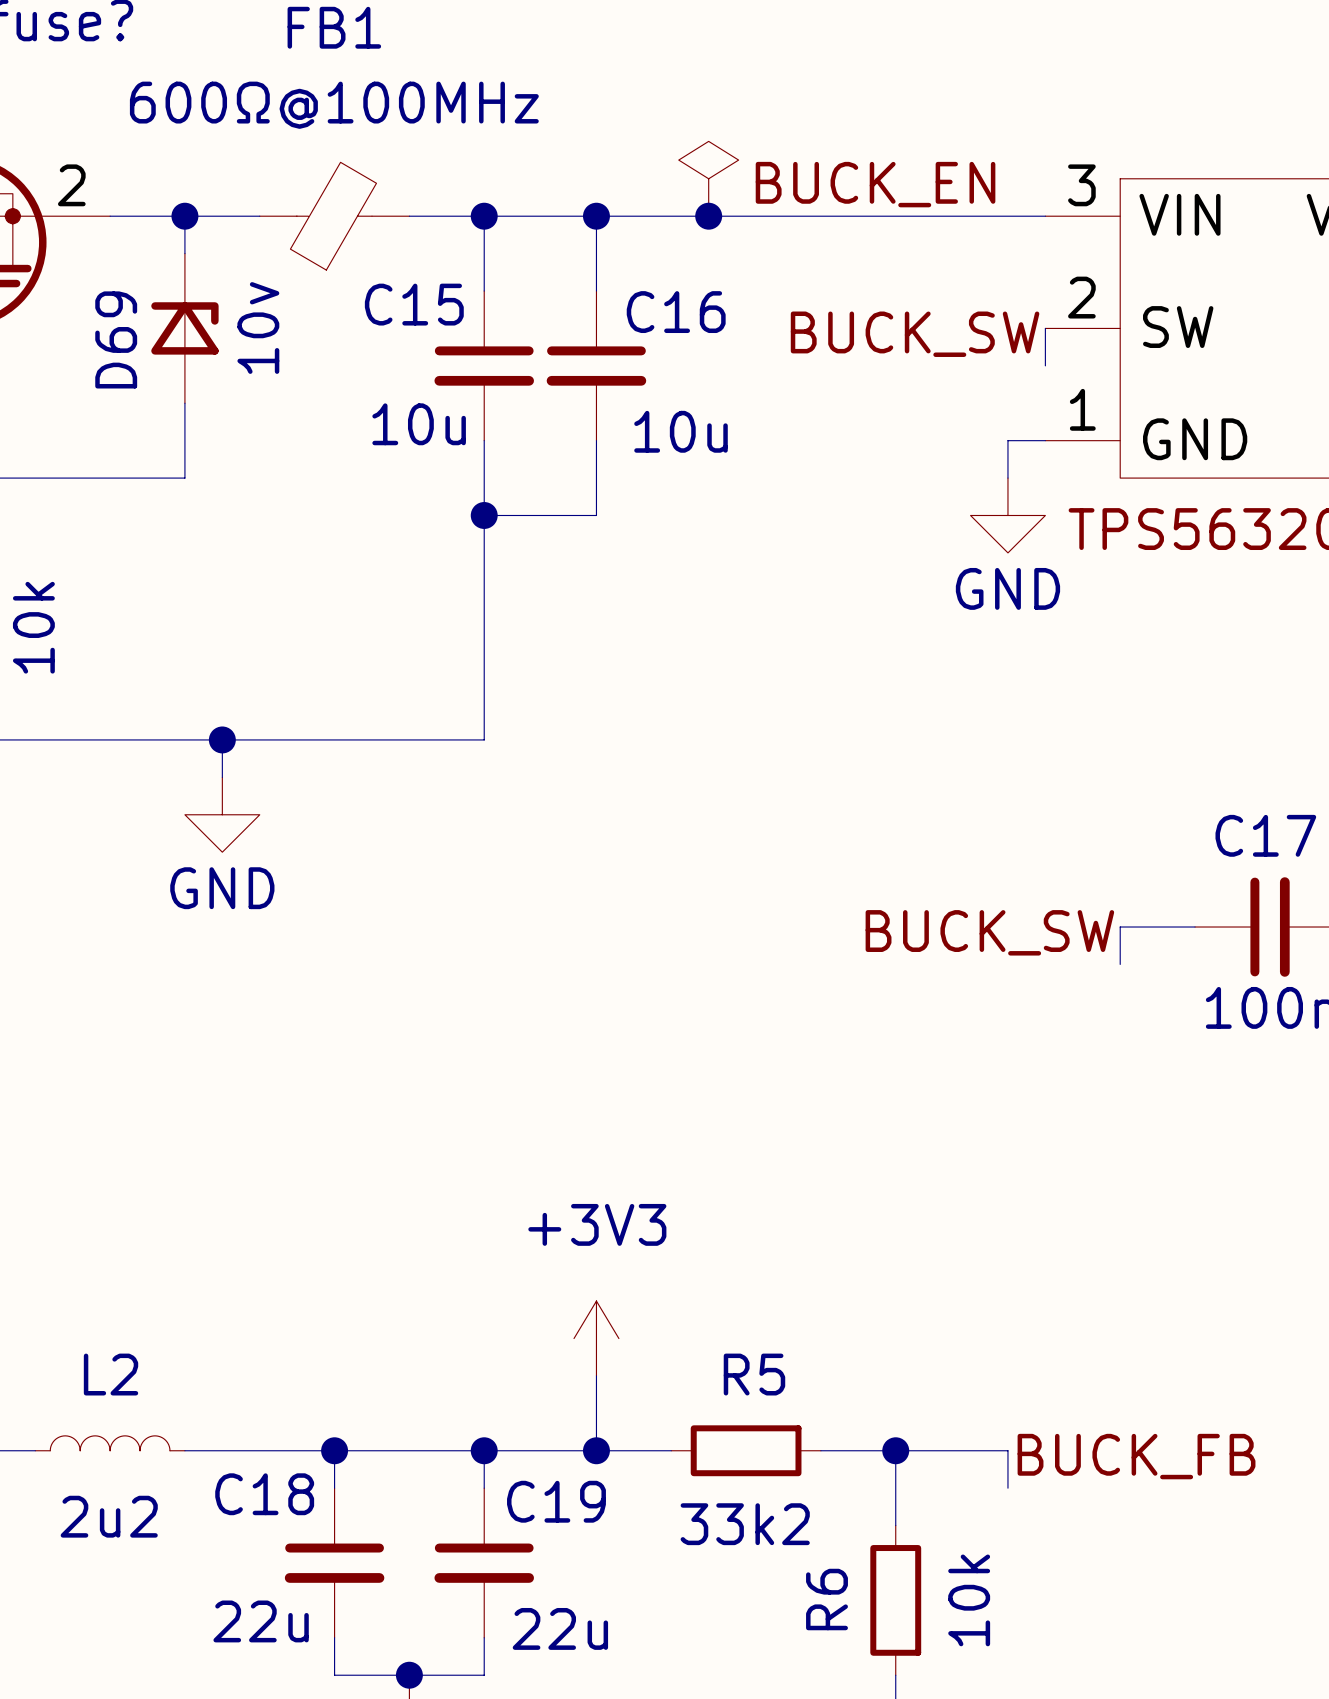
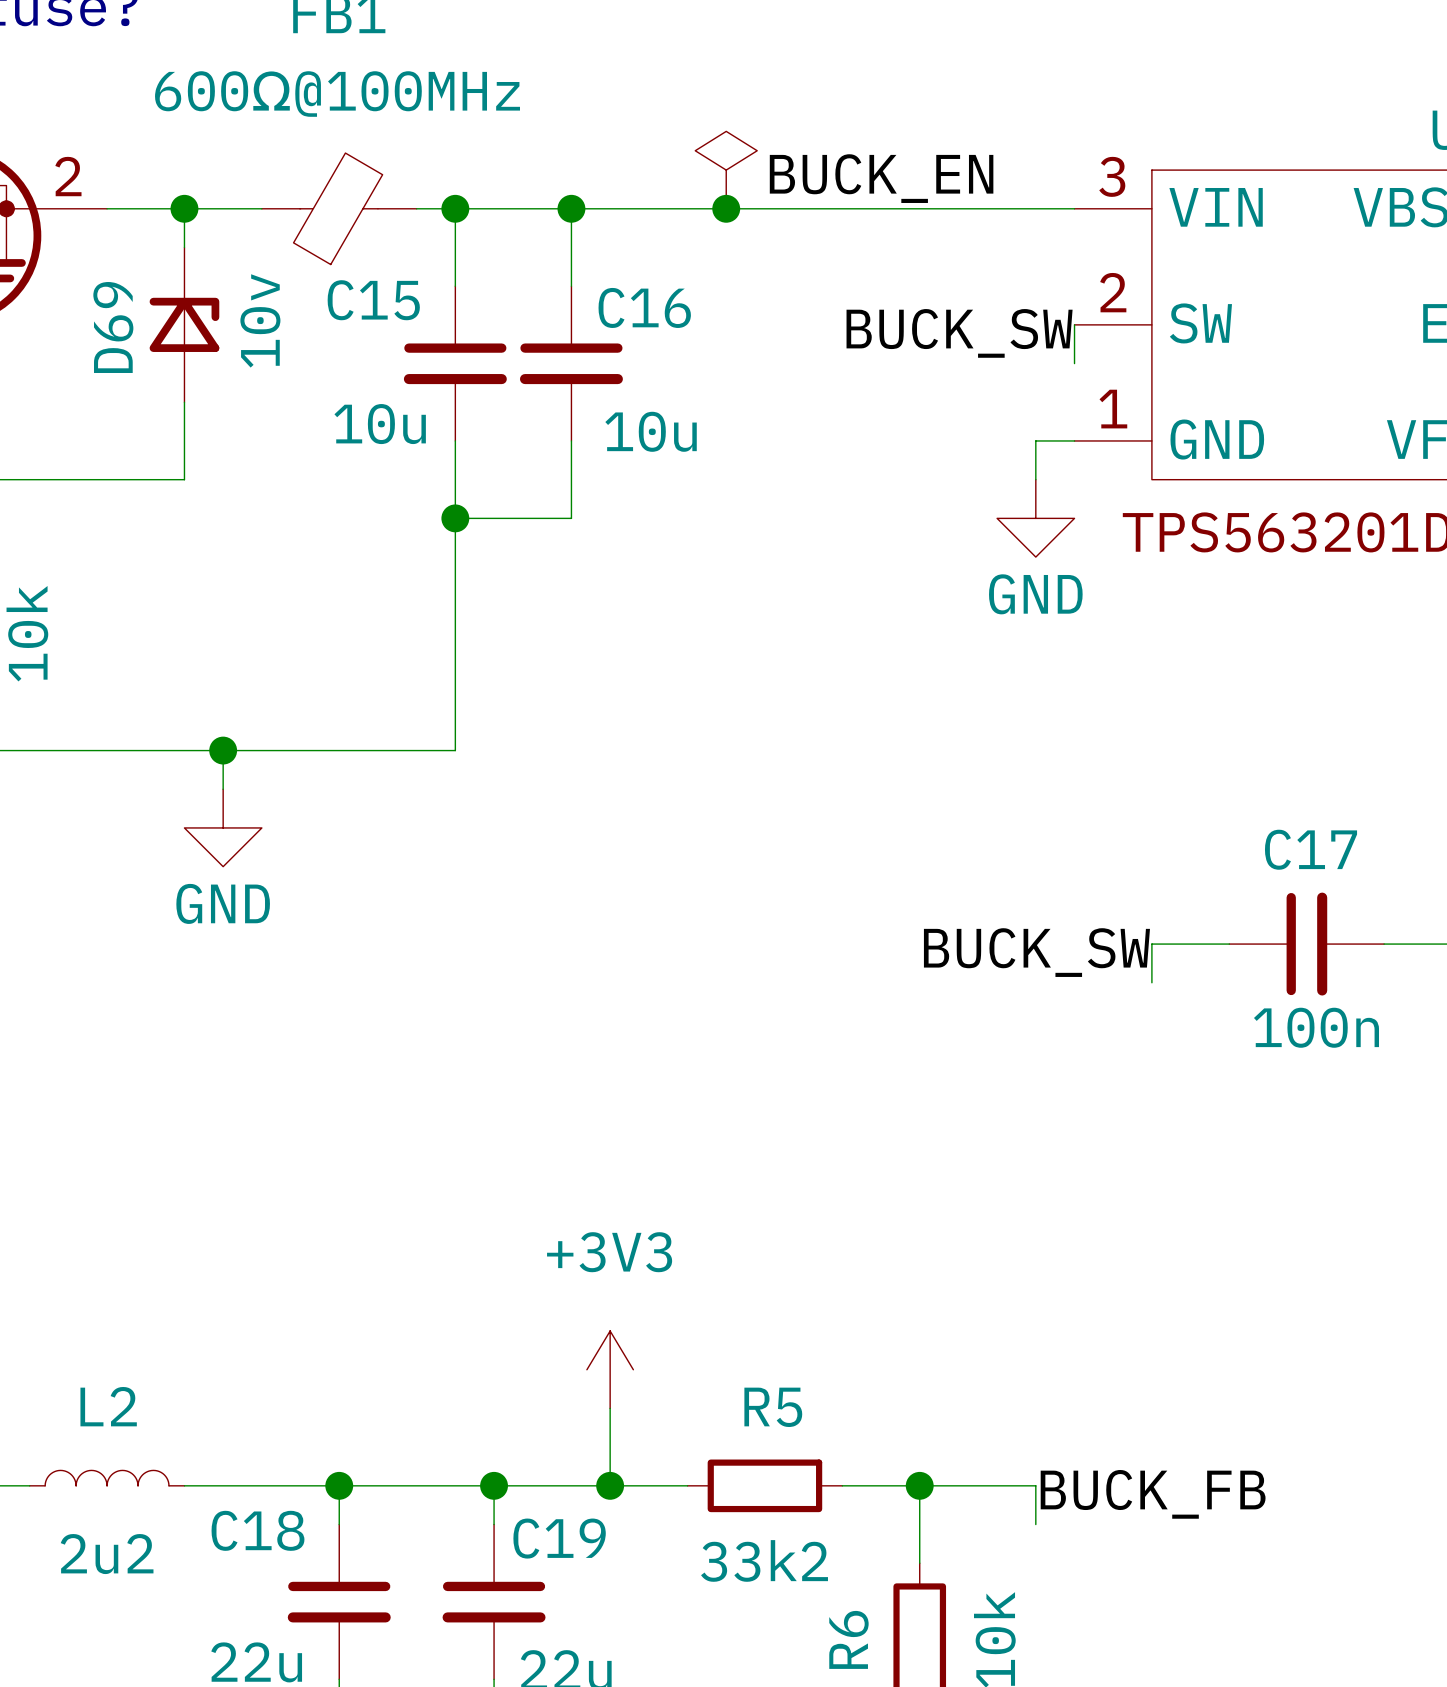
junction: none -> (455, 208)
wire: (484, 216) (484, 291) -> (455, 208) (455, 286)
junction: (484, 216) -> none
junction: none -> (571, 208)
wire: (596, 216) (596, 291) -> (571, 208) (571, 286)
junction: (596, 216) -> none
C15 position: (484, 365) -> (455, 363)
C16 position: (596, 365) -> (571, 363)
wire: (484, 440) (484, 739) (446, 739) -> (455, 440) (455, 750)
wire: (596, 440) (596, 515) (559, 515) -> (571, 440) (571, 518)
wire: none -> (455, 518) (494, 518)
junction position: (484, 515) -> (455, 518)

